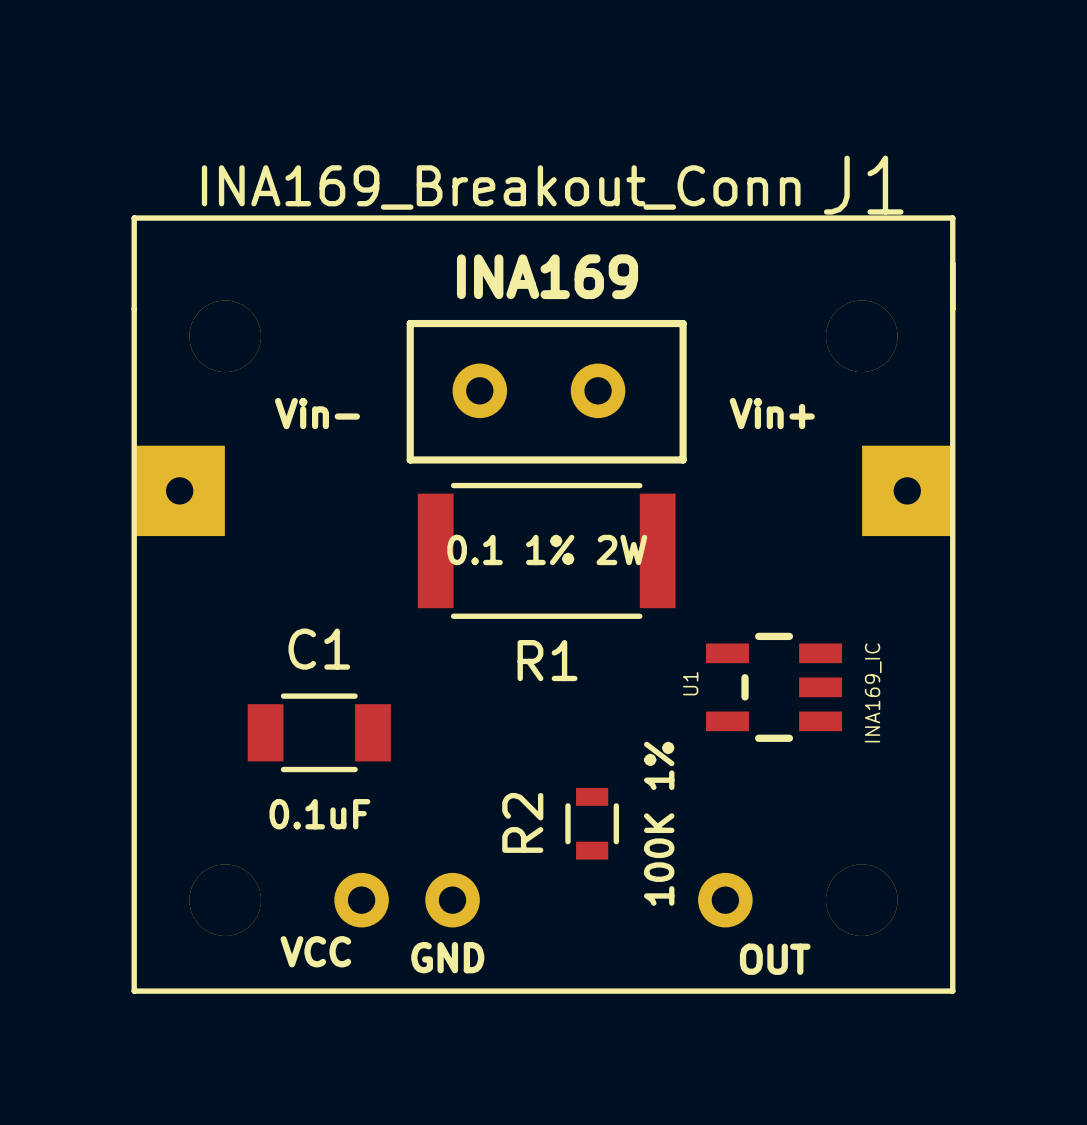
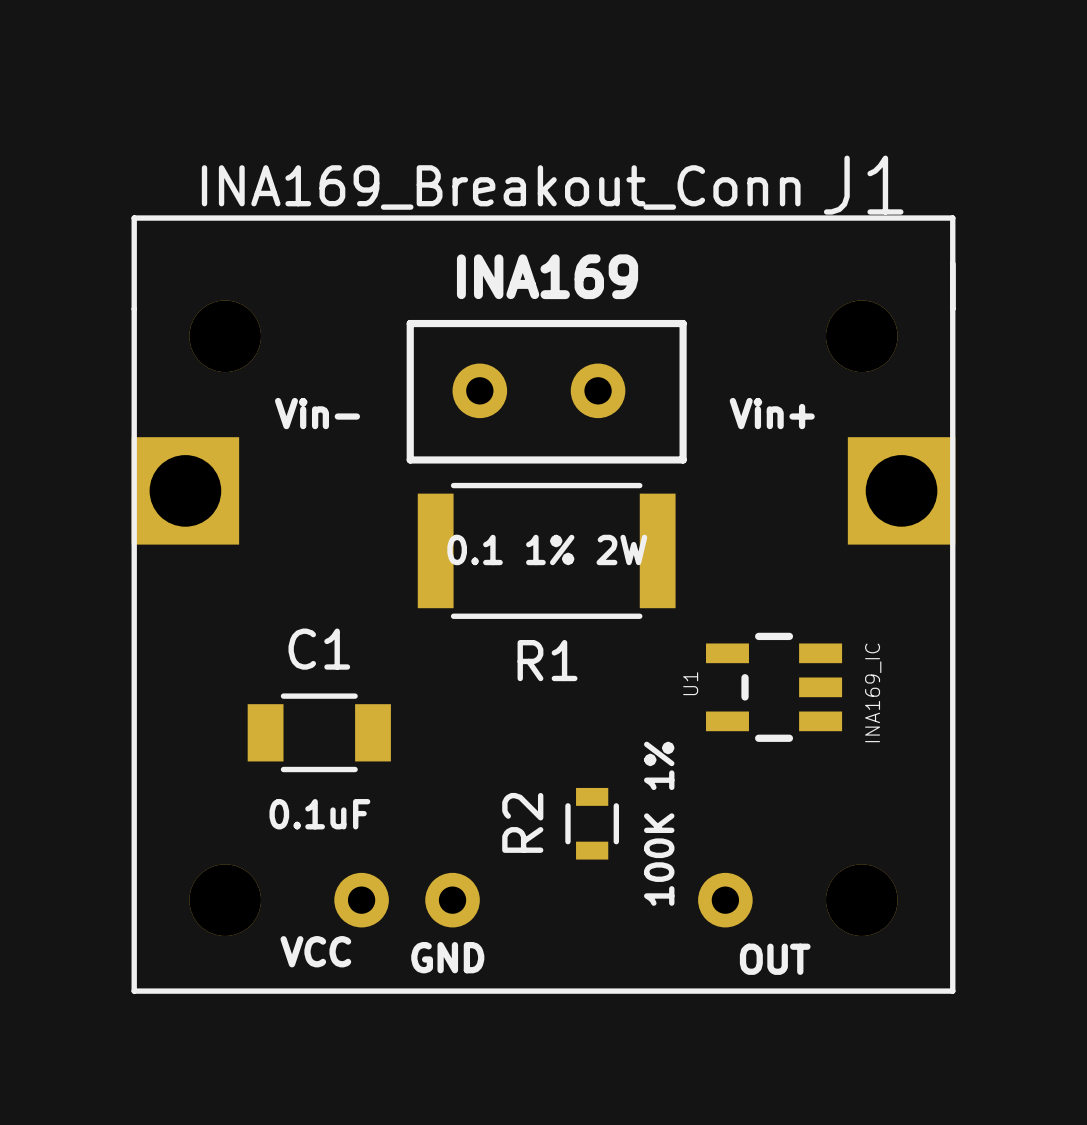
J1 footprint: [131, 215, 956, 994] -> [131, 215, 956, 994]

